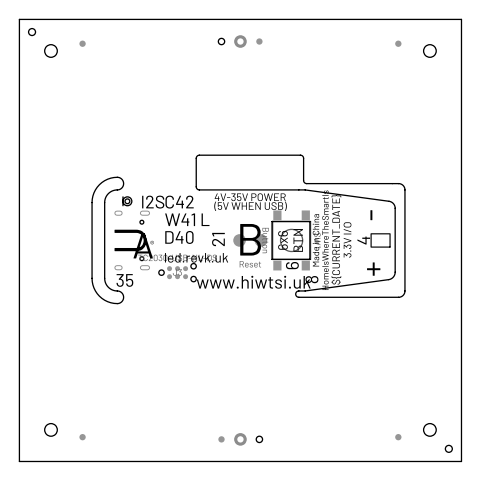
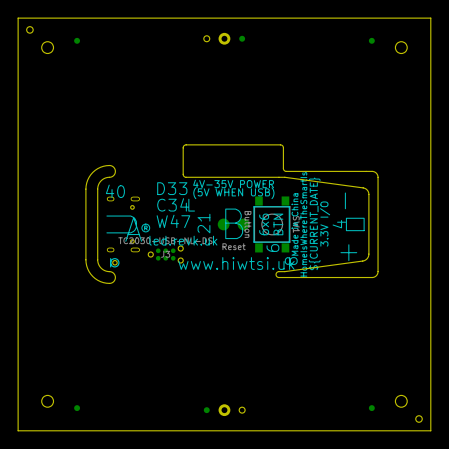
line: (122, 196) (122, 205) -> (110, 258) (110, 266)
part position: (127, 201) -> (114, 262)
drawing position: (127, 201) -> (114, 262)
text: I2S (153, 202) -> D33 (172, 188)
text: C42 (179, 202) -> none
text: none -> 40 (115, 191)
text: W41 (180, 219) -> C34 (172, 204)
text: D40 (179, 237) -> W47 (173, 221)
text: 35 (124, 280) -> none

